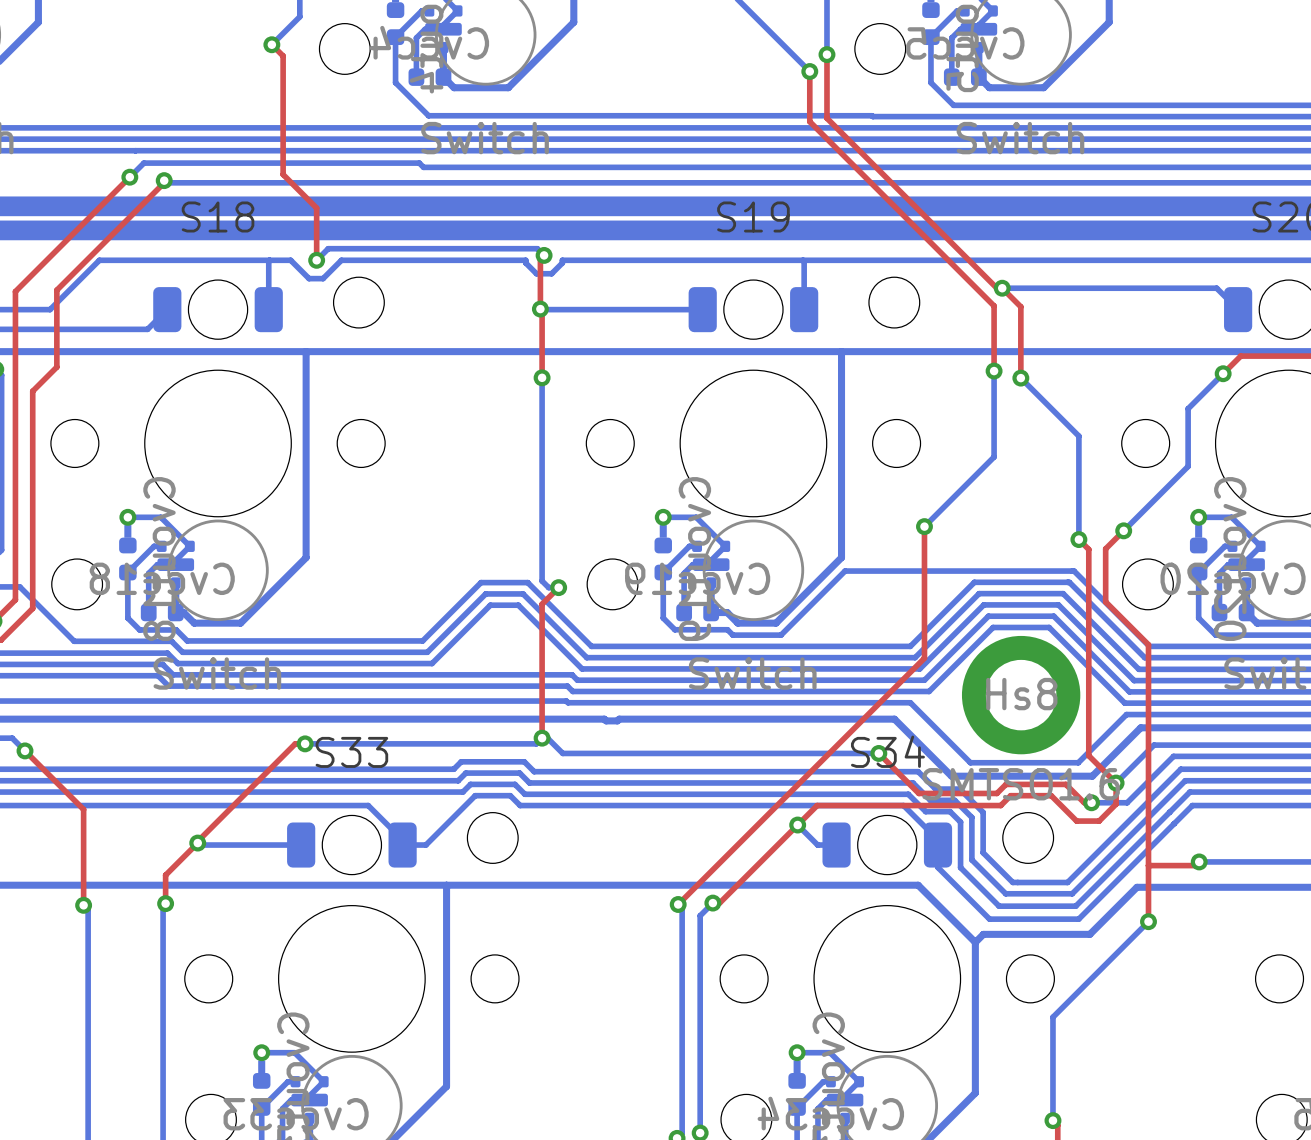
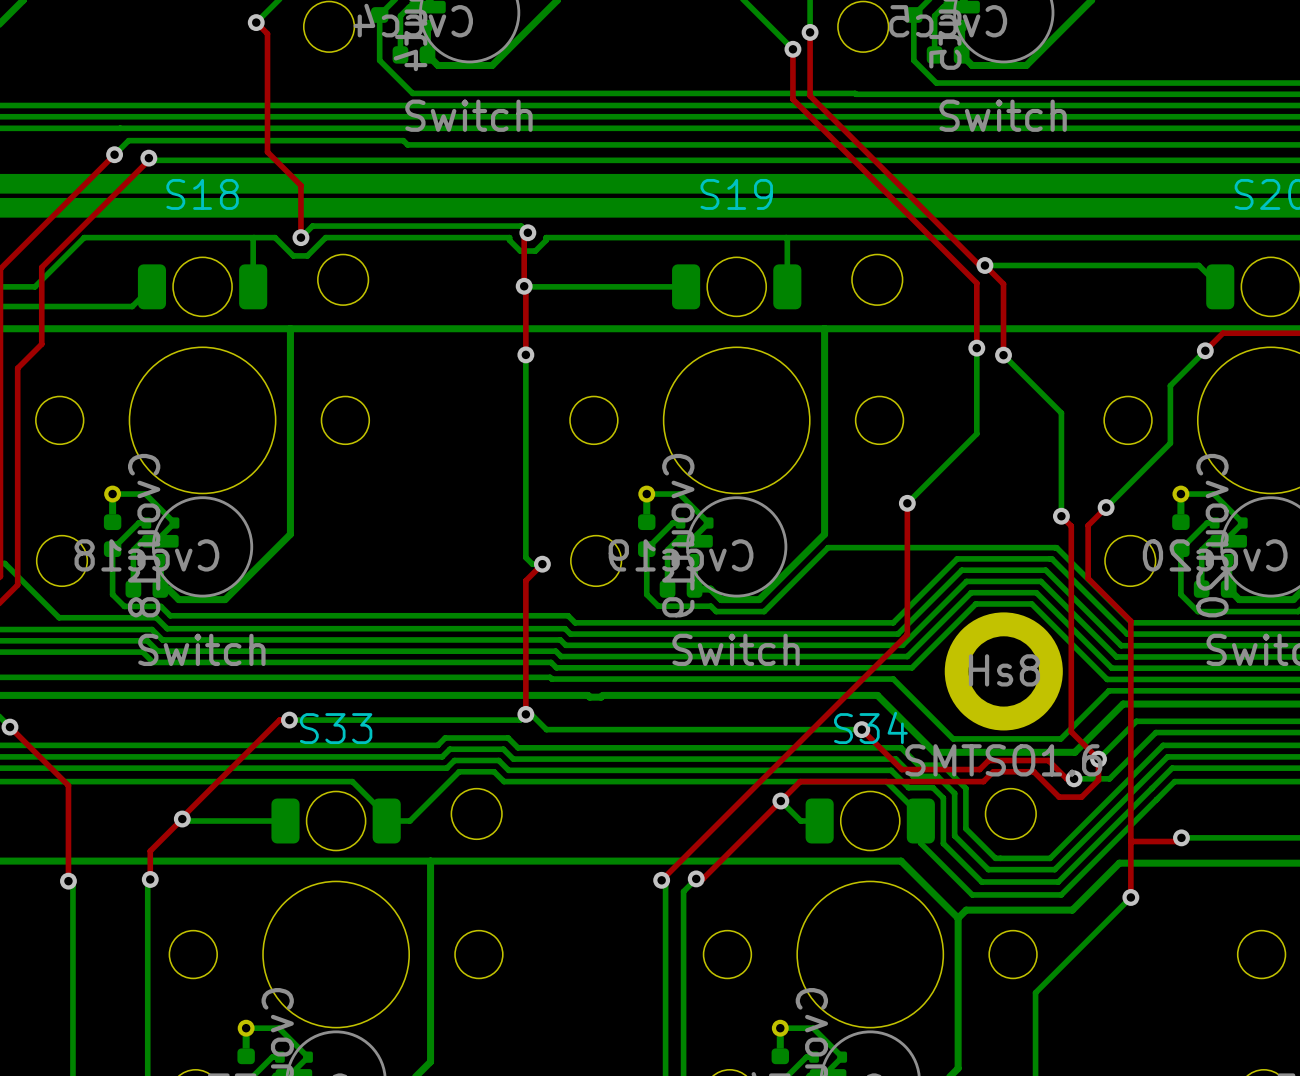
bottom track: (185, 639) (187, 640) (422, 640) (481, 582) (527, 582) (584, 639) -> (170, 615) (568, 615)
bottom track: (427, 652) (485, 593) (523, 593) (581, 652) -> (411, 628) (565, 628)
bottom track: (432, 663) (490, 605) (518, 605) (576, 663) -> (416, 639) (560, 639)

